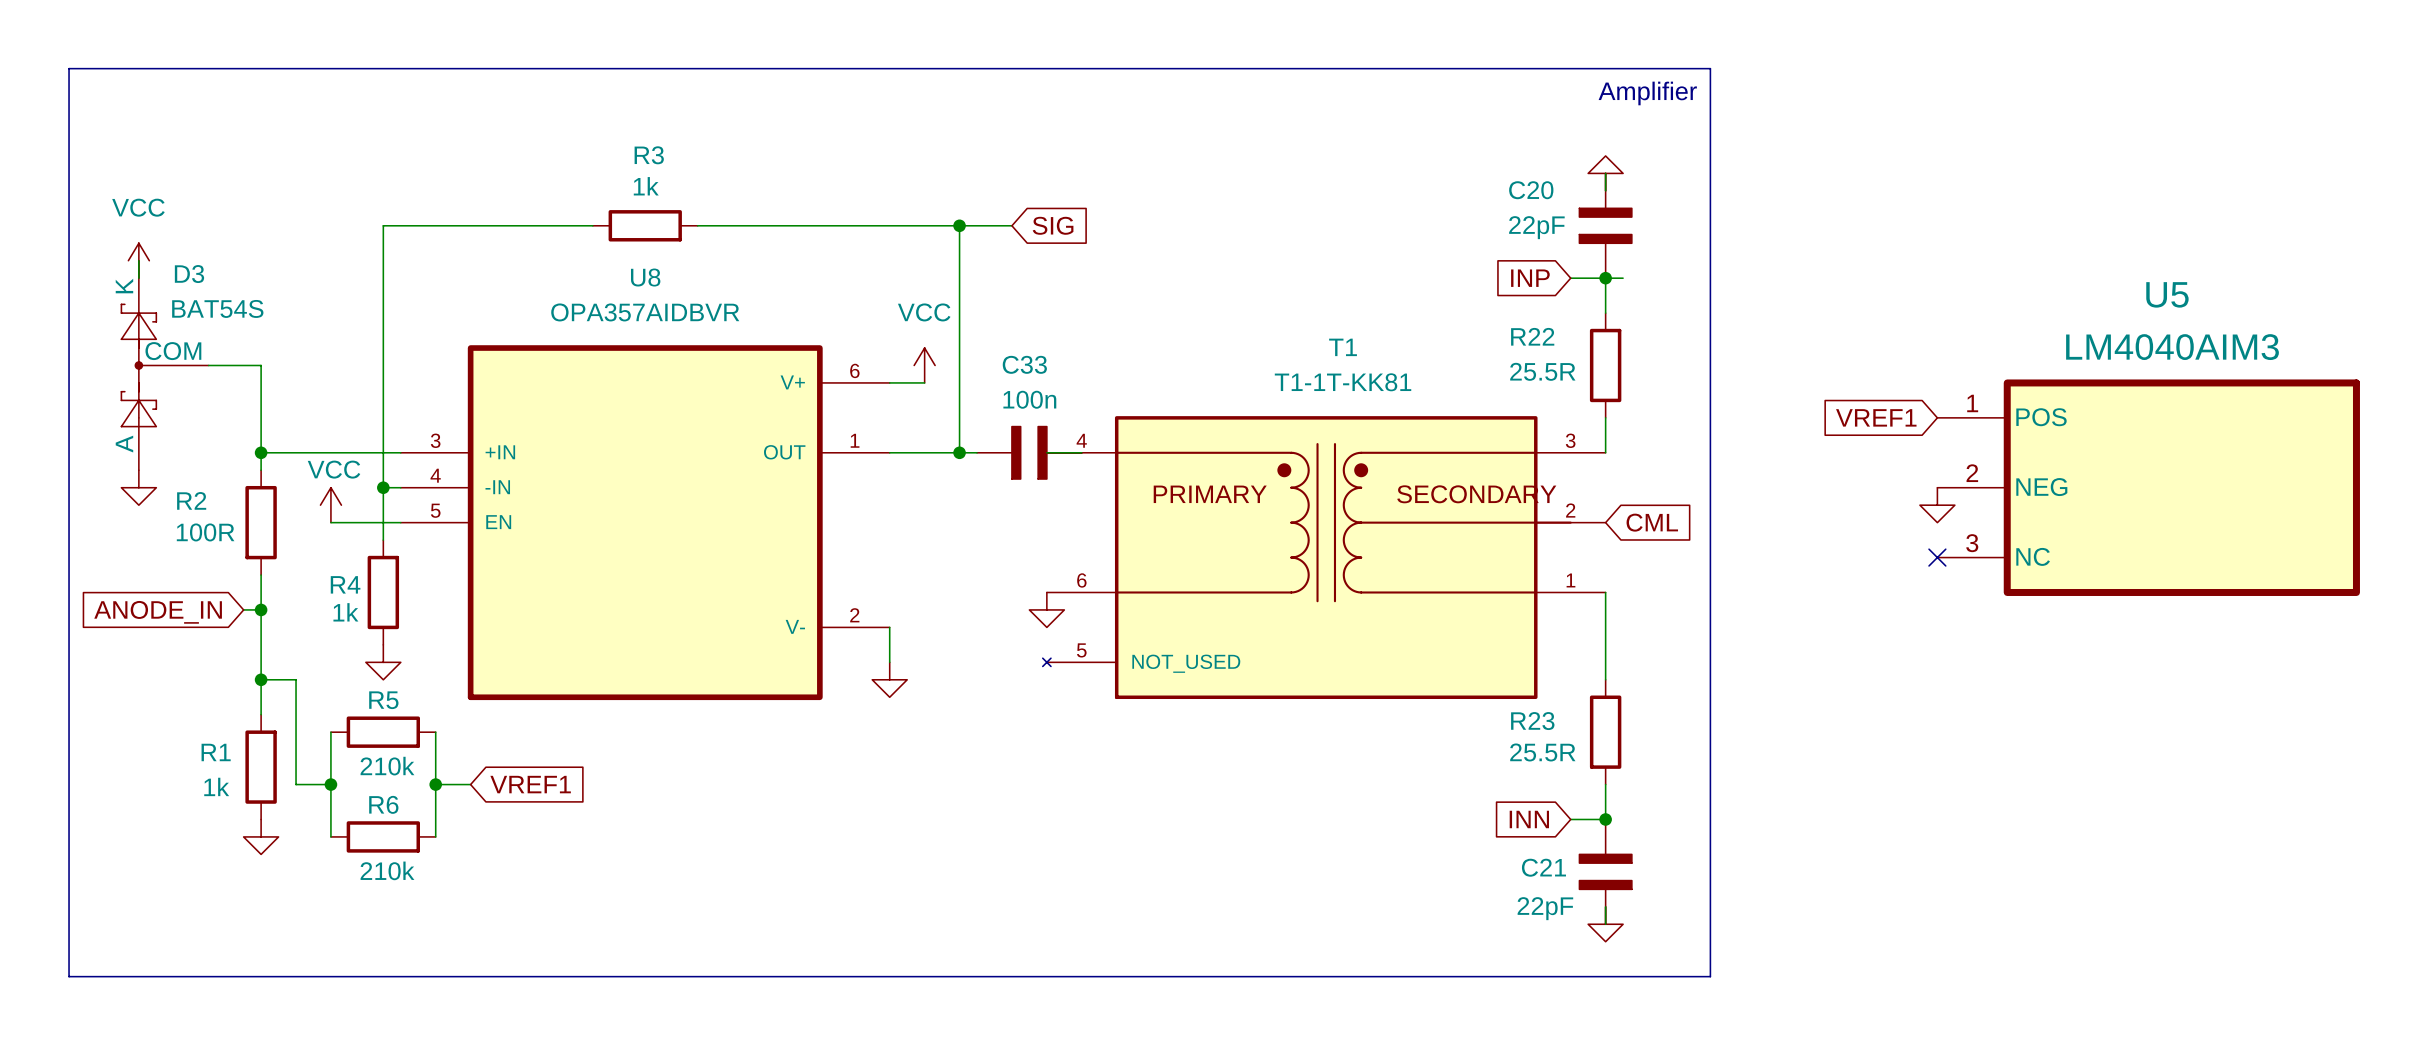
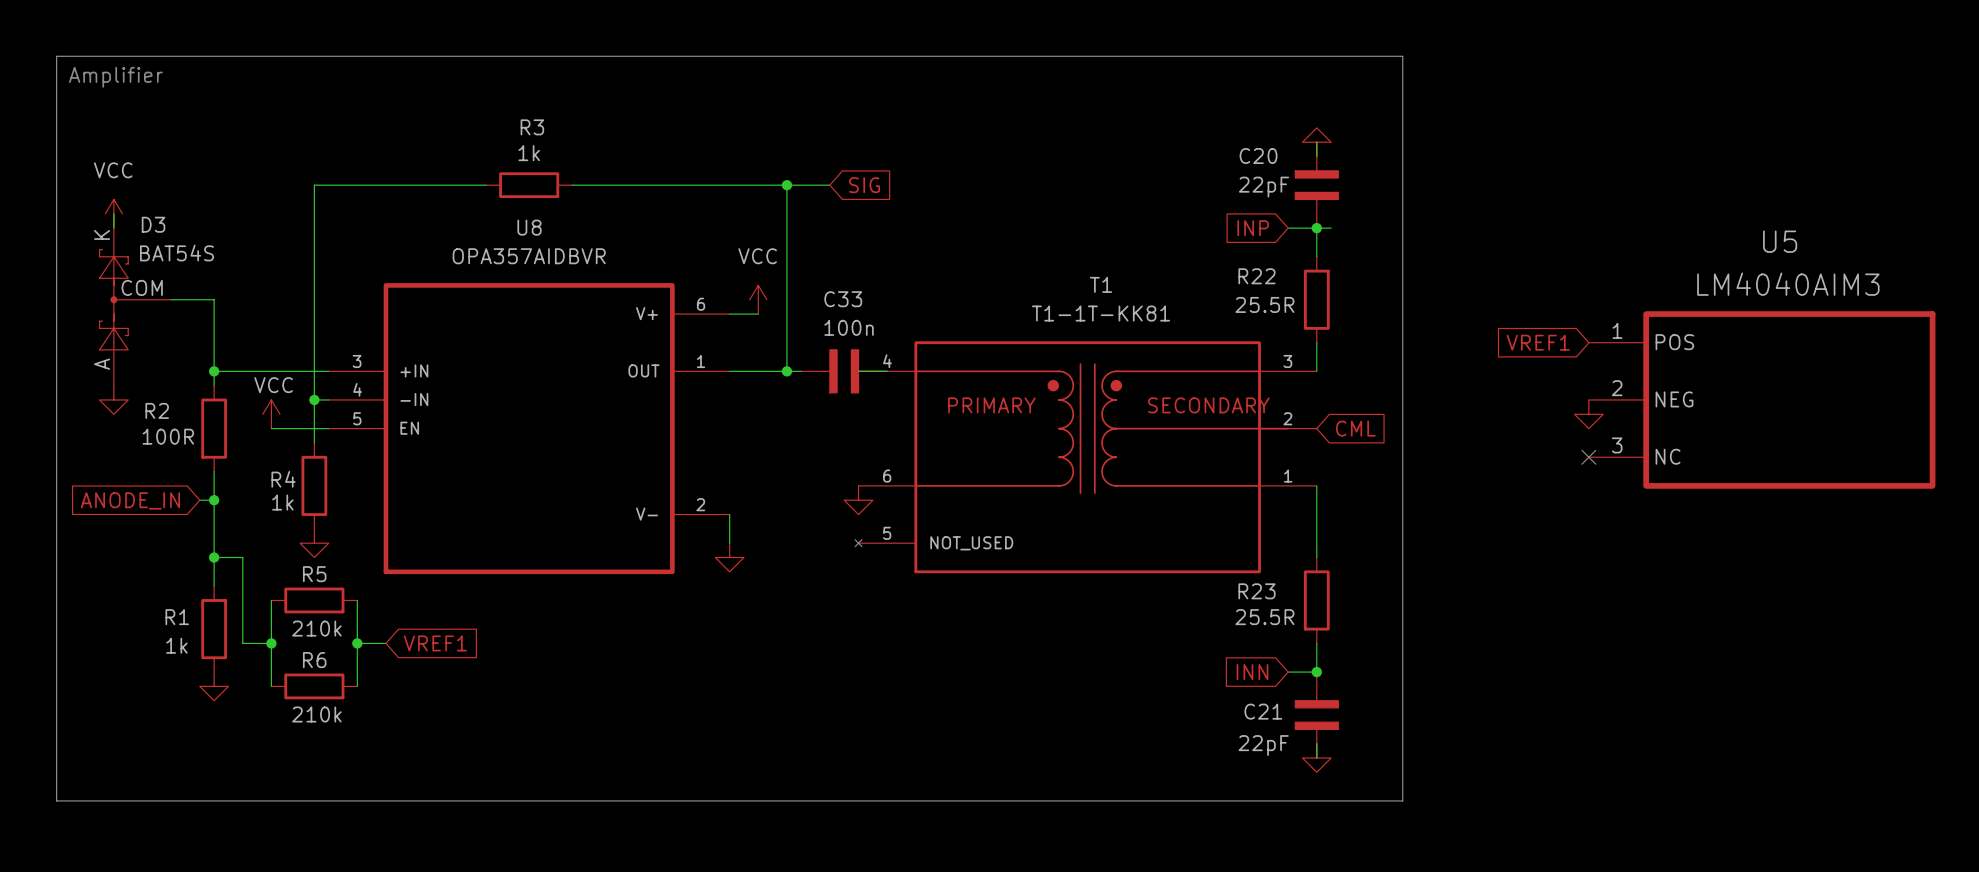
text: none -> Amplifier (115, 77)
text: Amplifier (1647, 93) -> none

